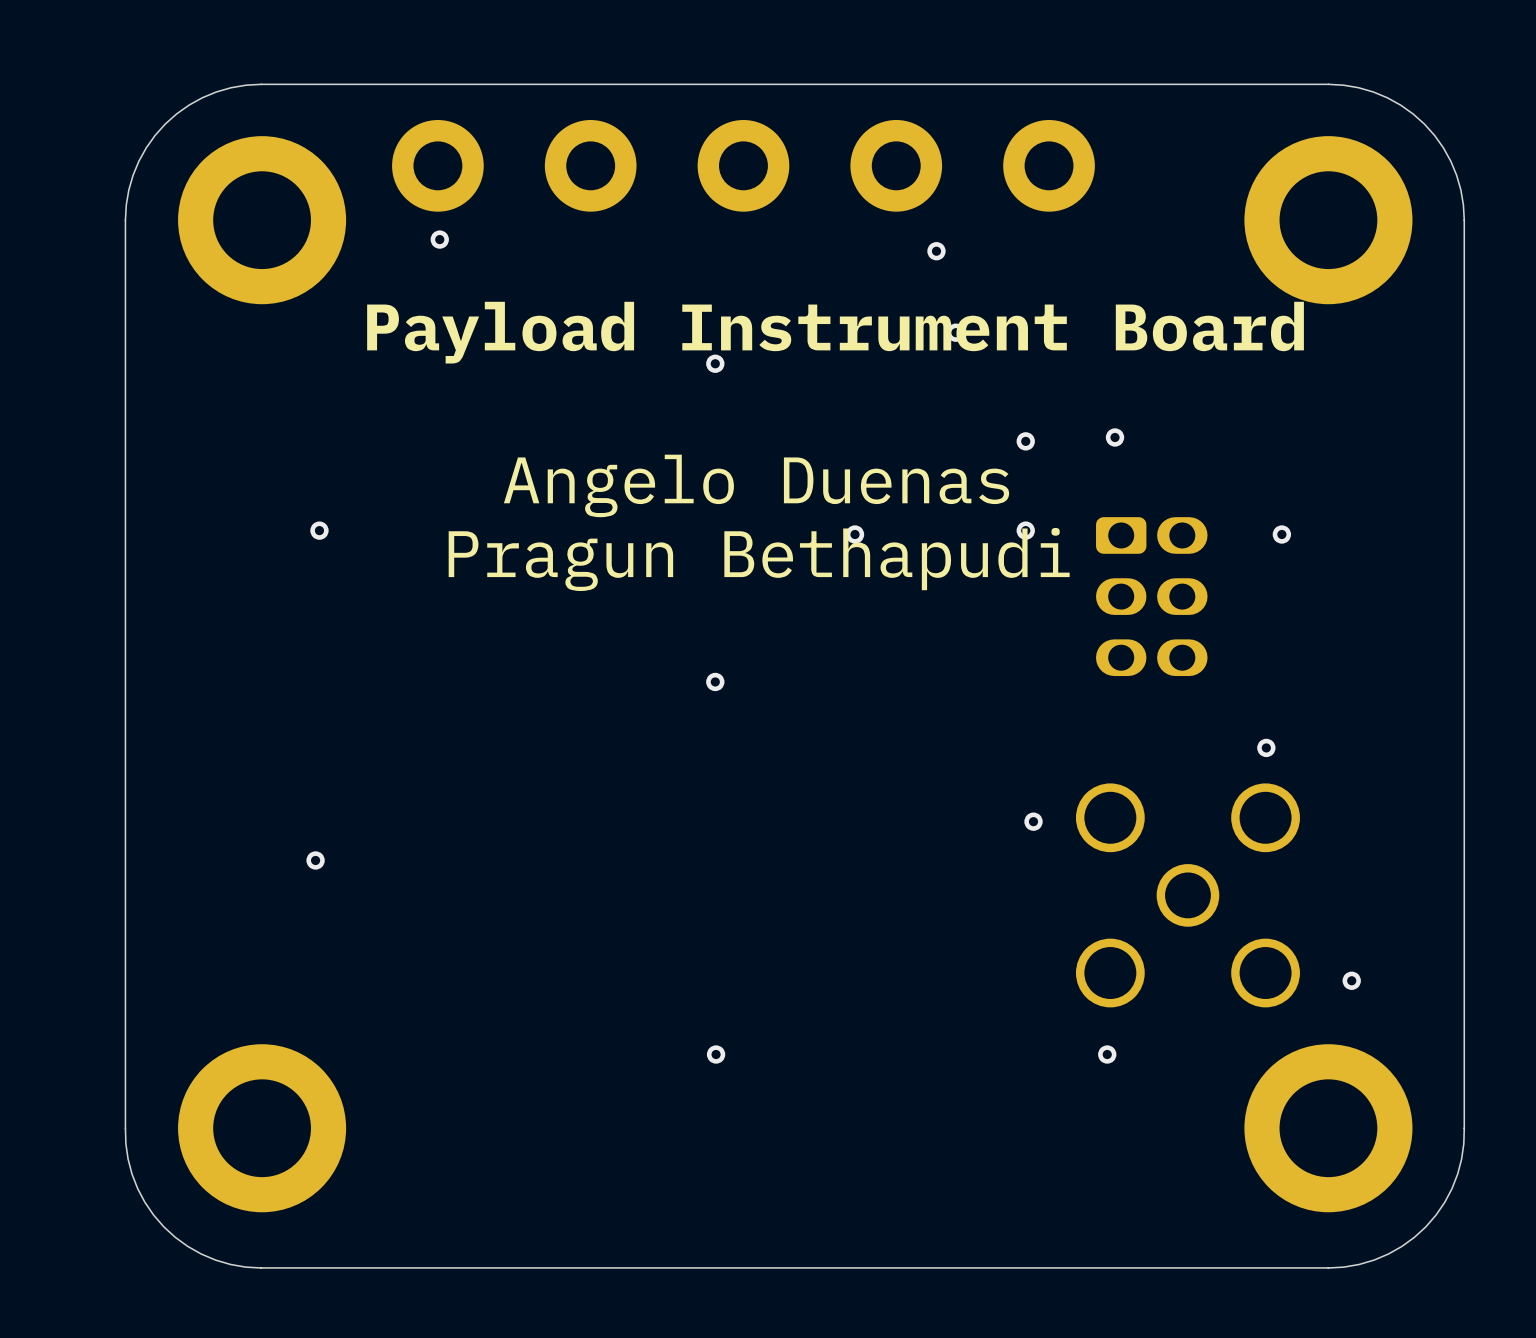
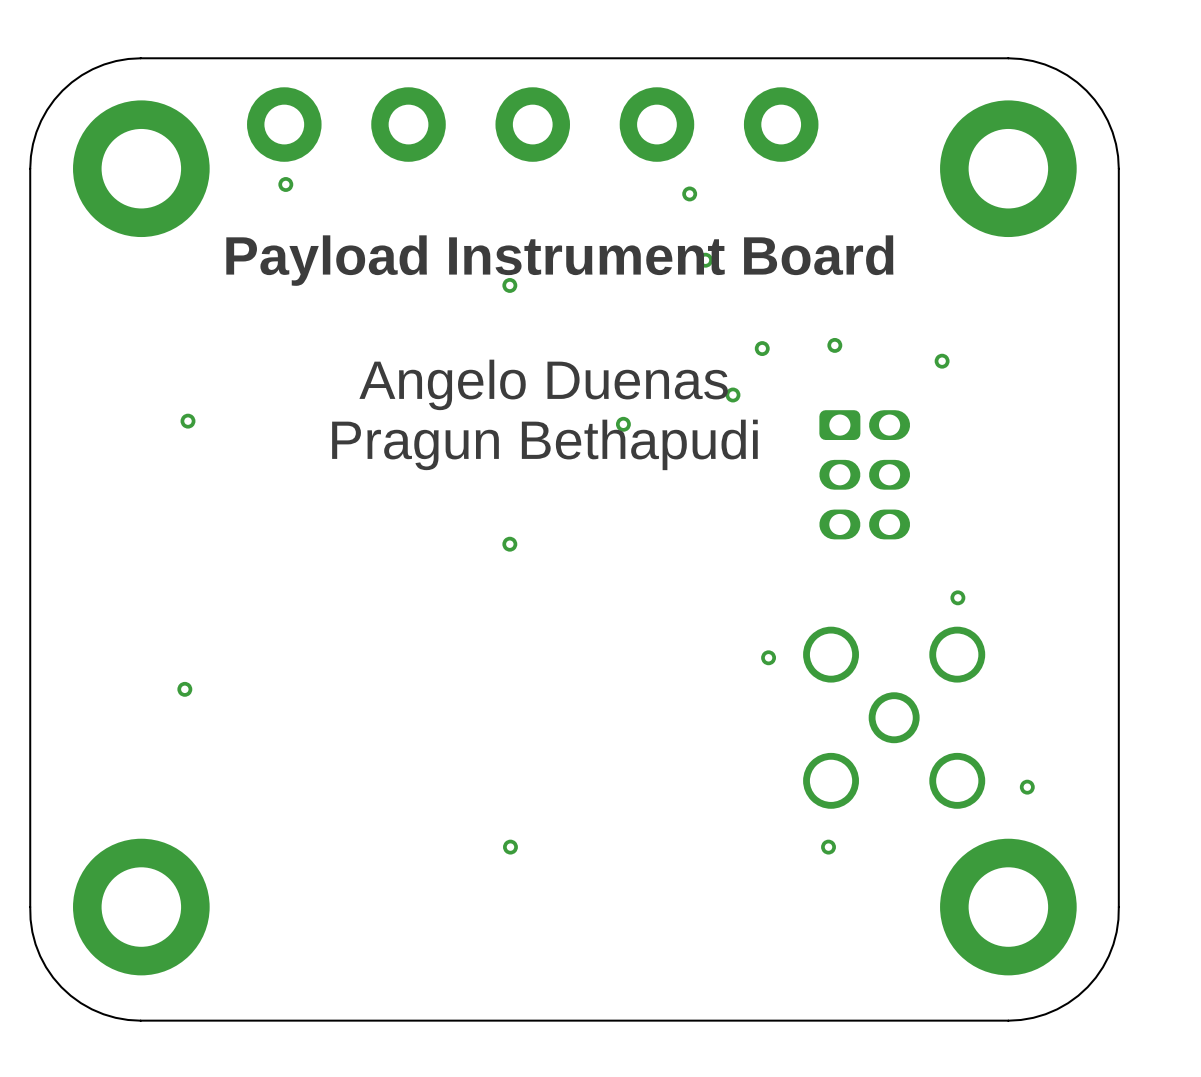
via position: (1025, 530) -> (732, 395)
via position: (1281, 534) -> (942, 361)

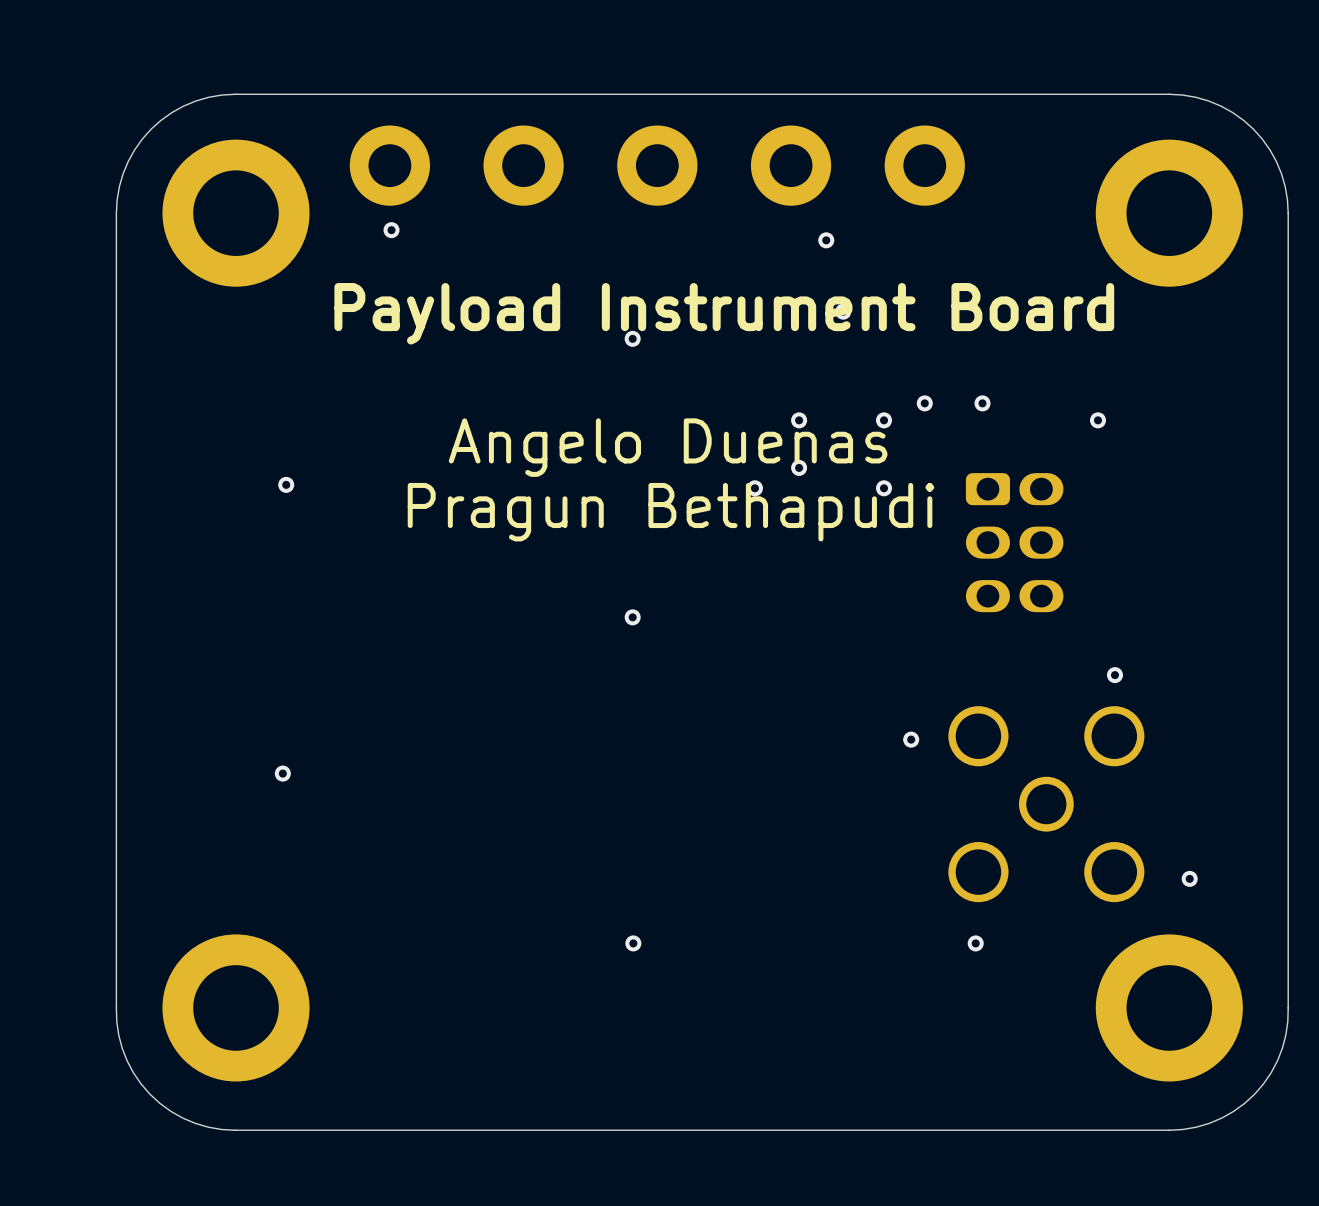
via: none -> (924, 403)
via: (762, 348) -> none
via: none -> (799, 420)
via: none -> (884, 420)
via: (732, 395) -> none
via: none -> (799, 467)
via: none -> (884, 488)

